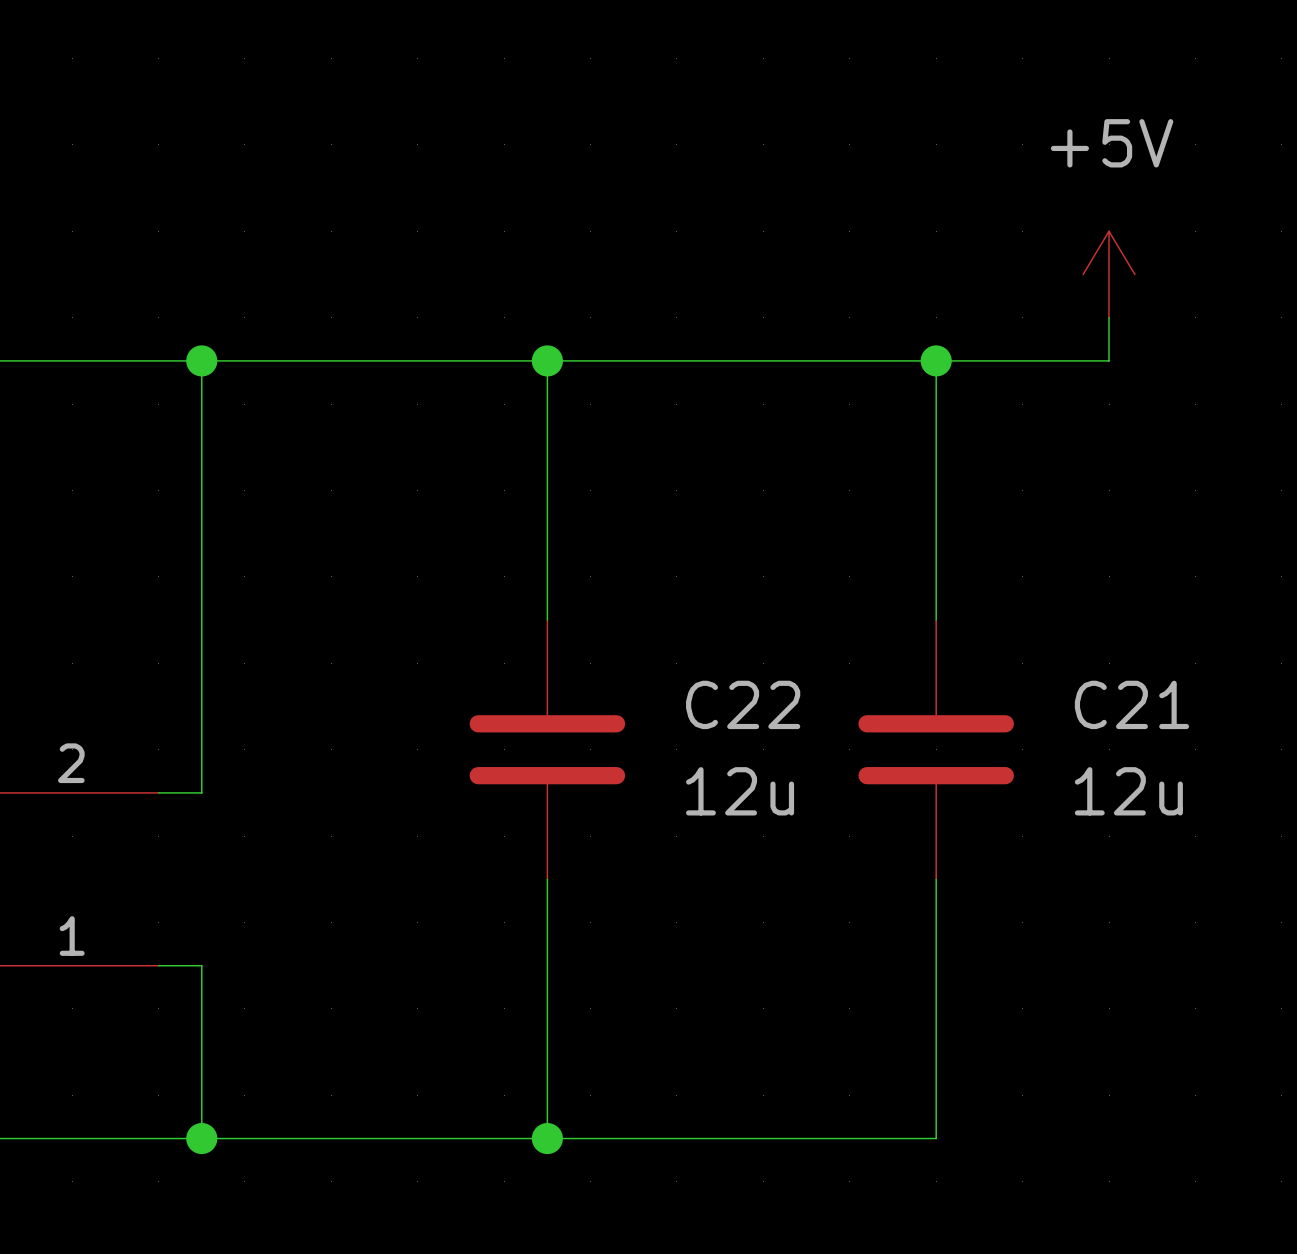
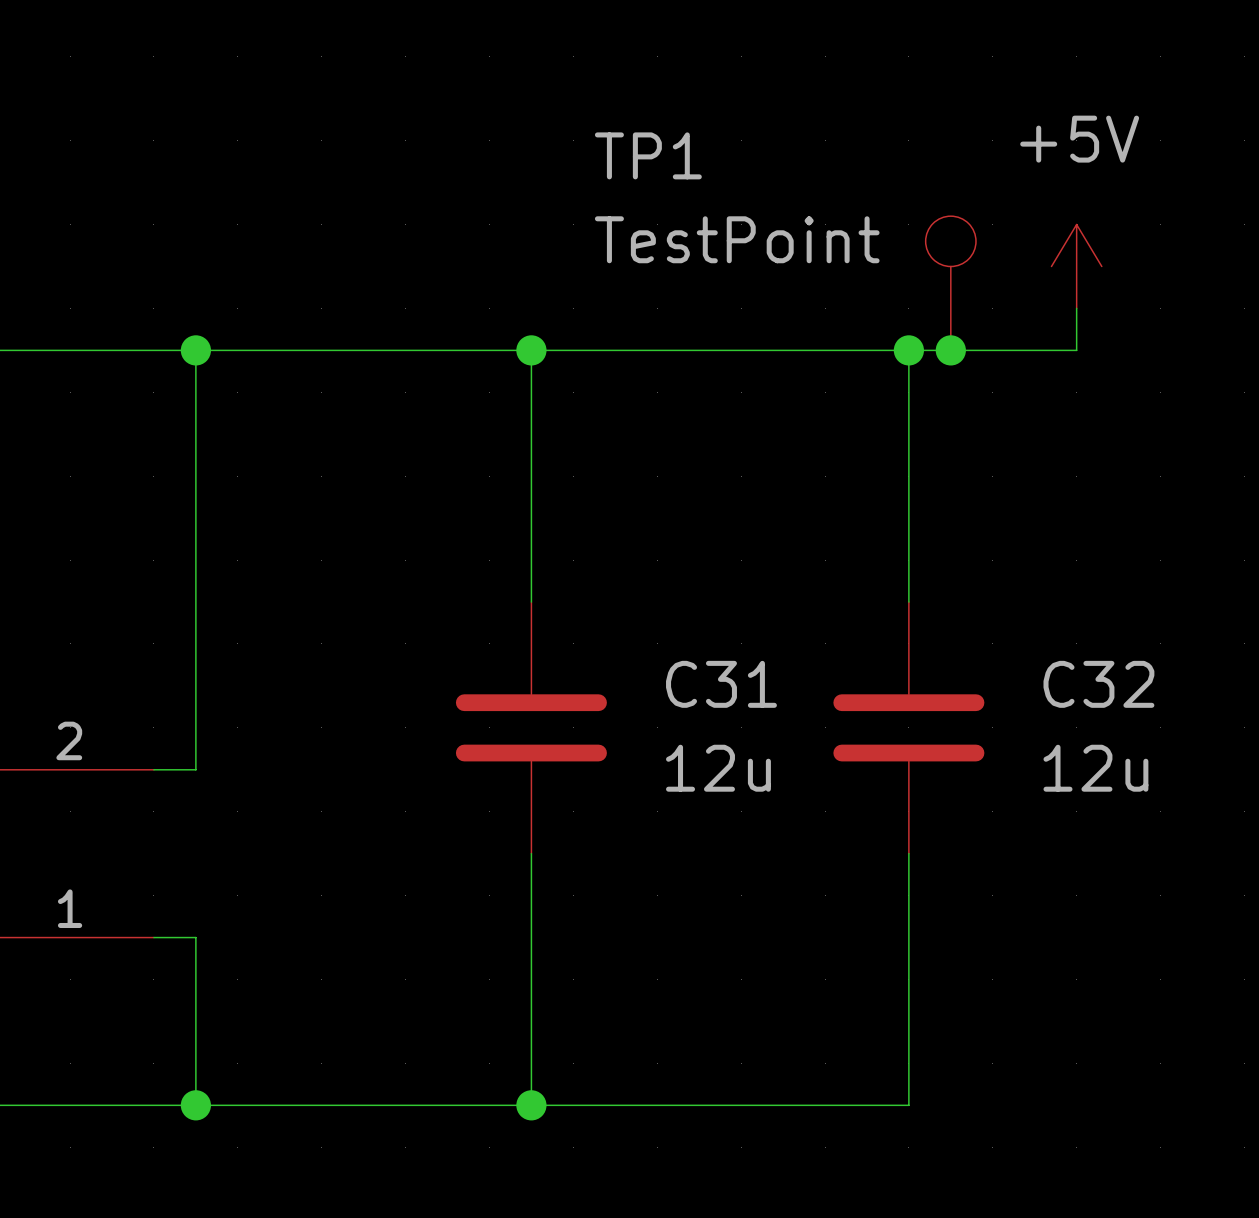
TP1: none -> TestPoint (950, 283)
junction: none -> (950, 350)
C22 name: C22 (743, 704) -> C31 (721, 684)
C21 name: C21 (1131, 704) -> C32 (1098, 684)

